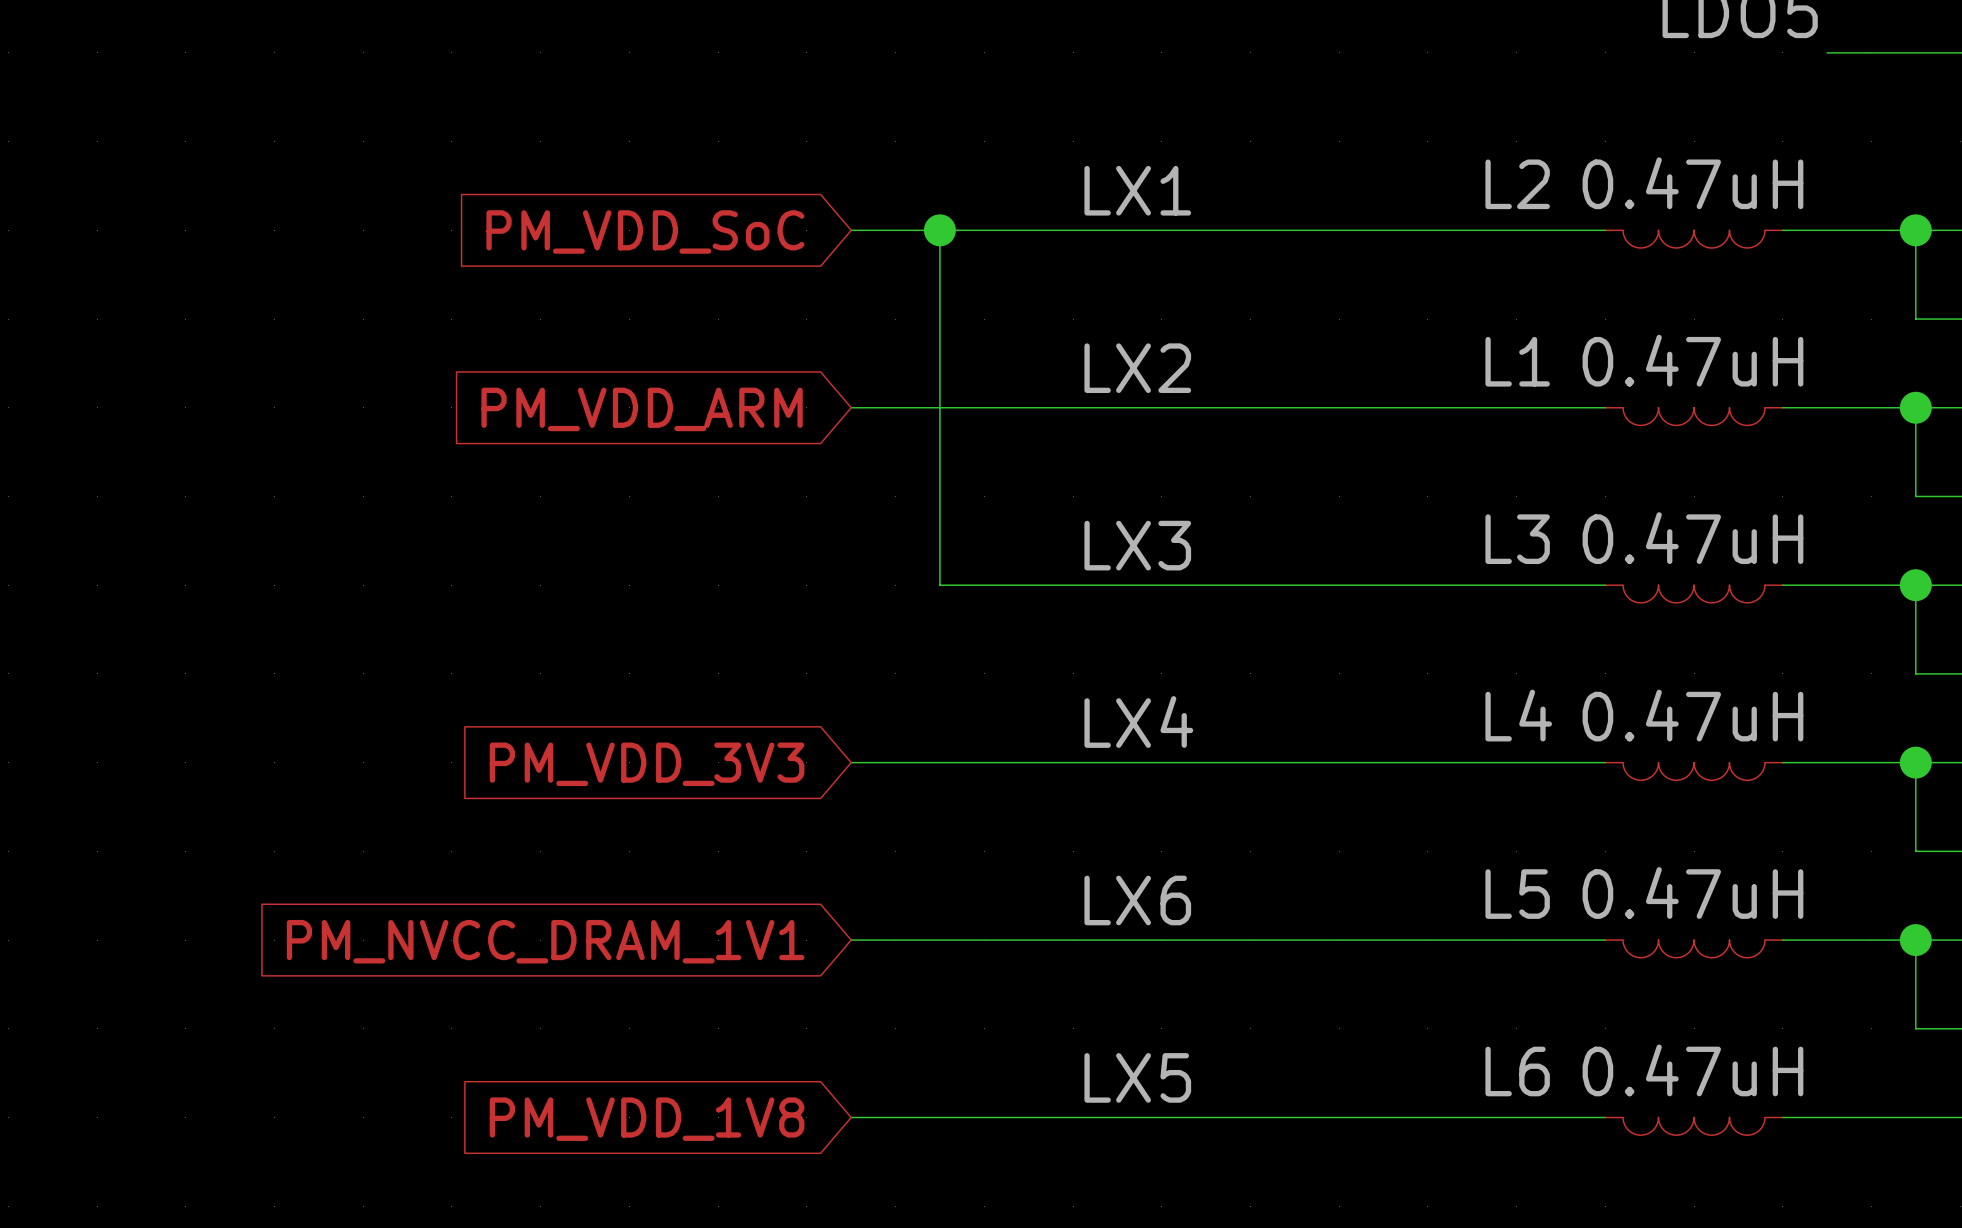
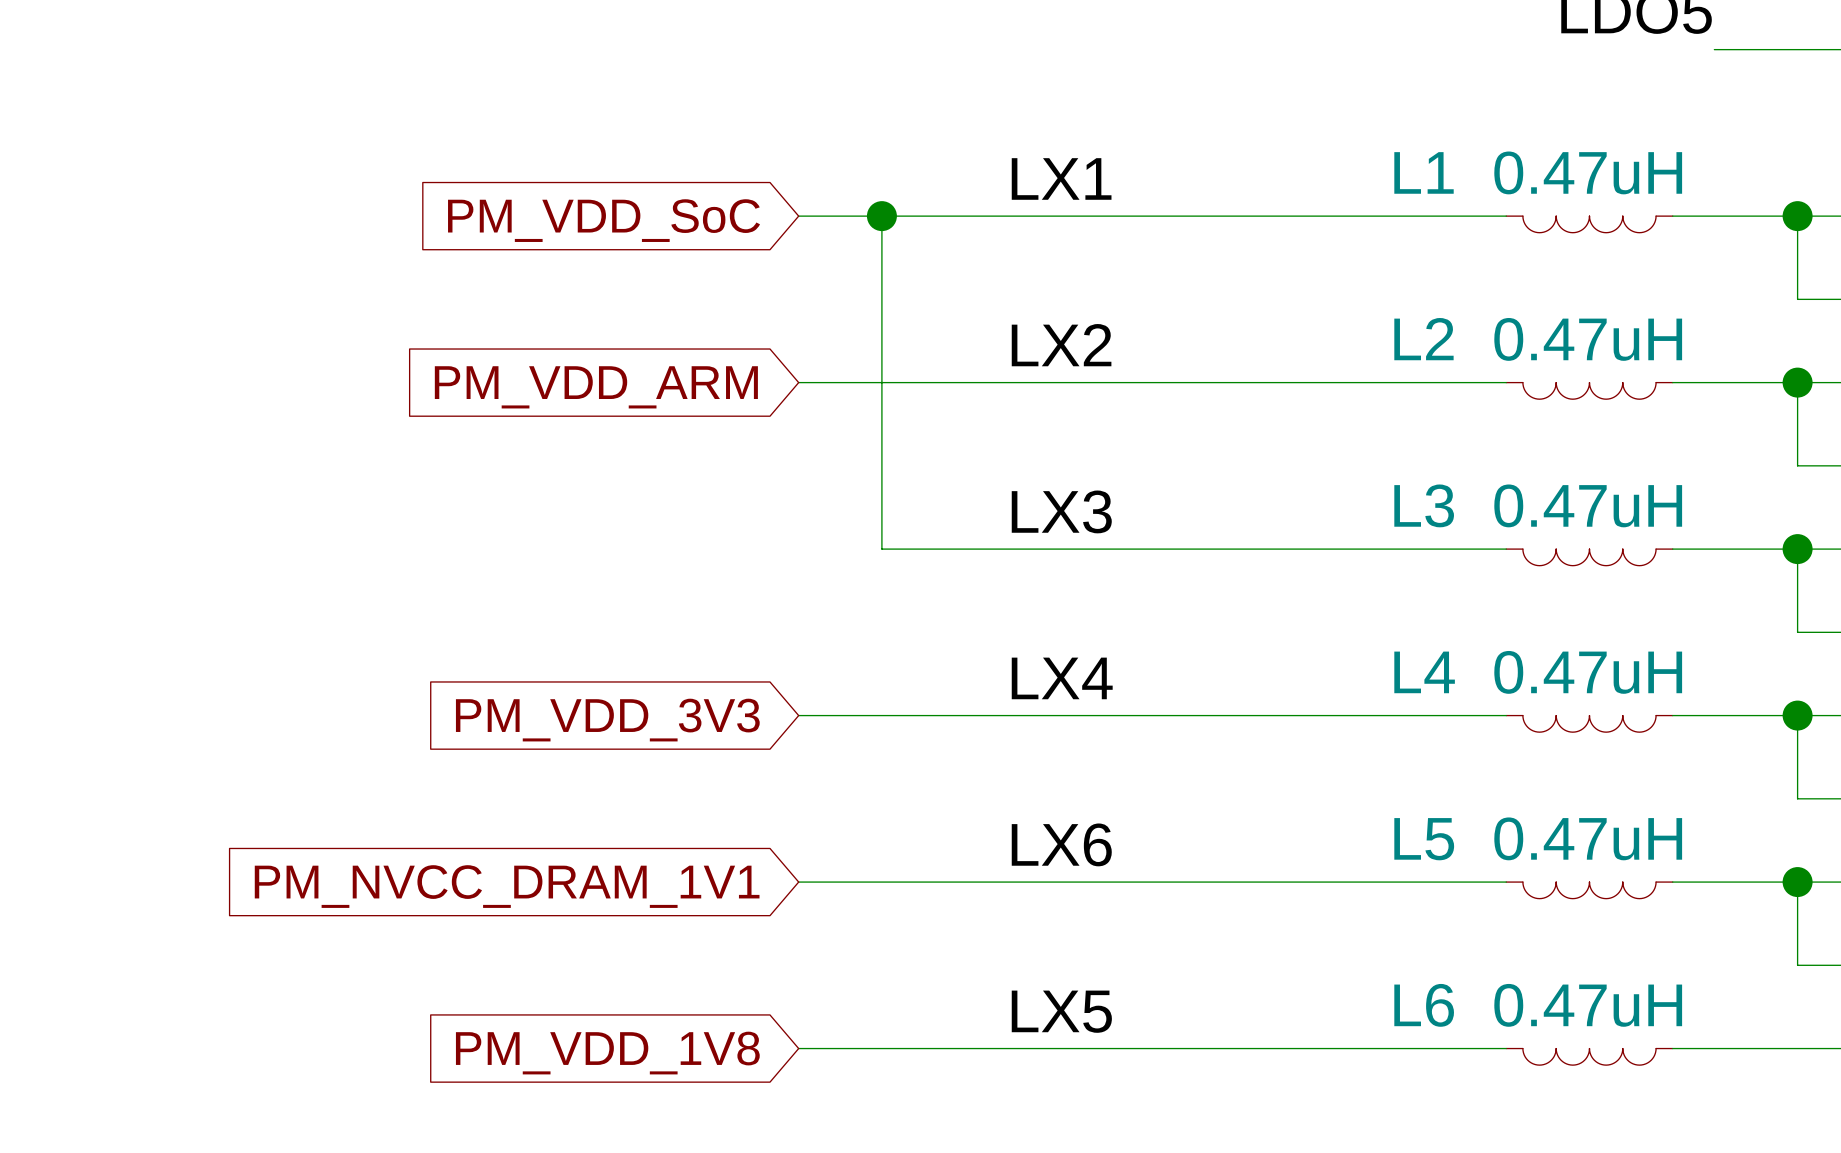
L2 name: L2 (1517, 184) -> L1 (1424, 172)
L1 name: L1 (1517, 361) -> L2 (1423, 339)

